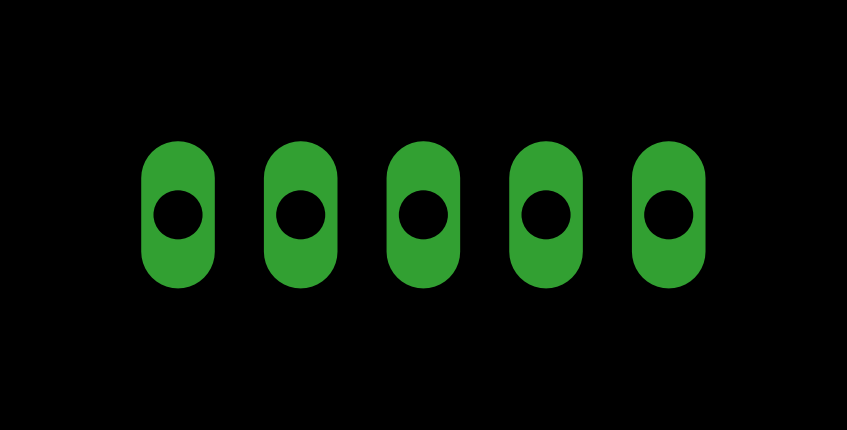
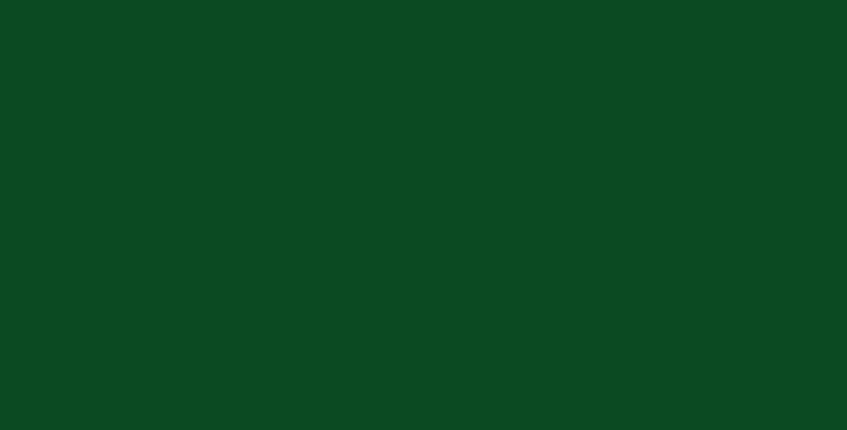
part: (423, 214) -> none

